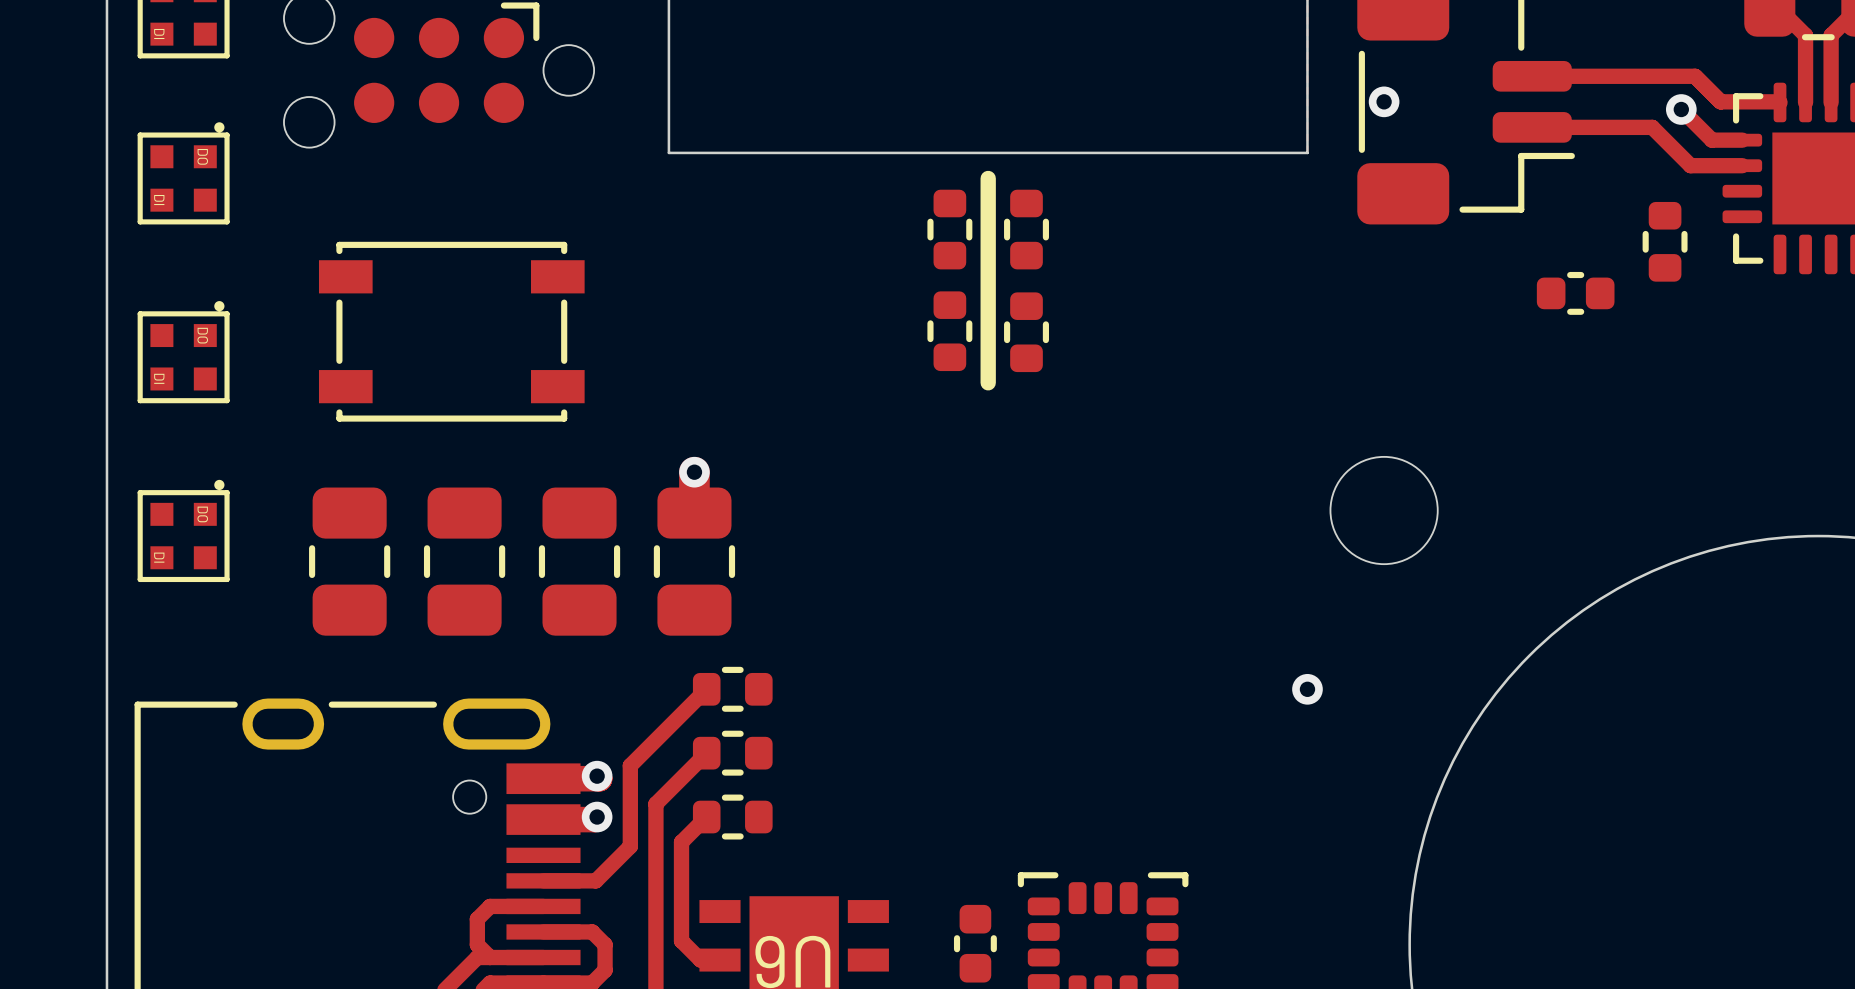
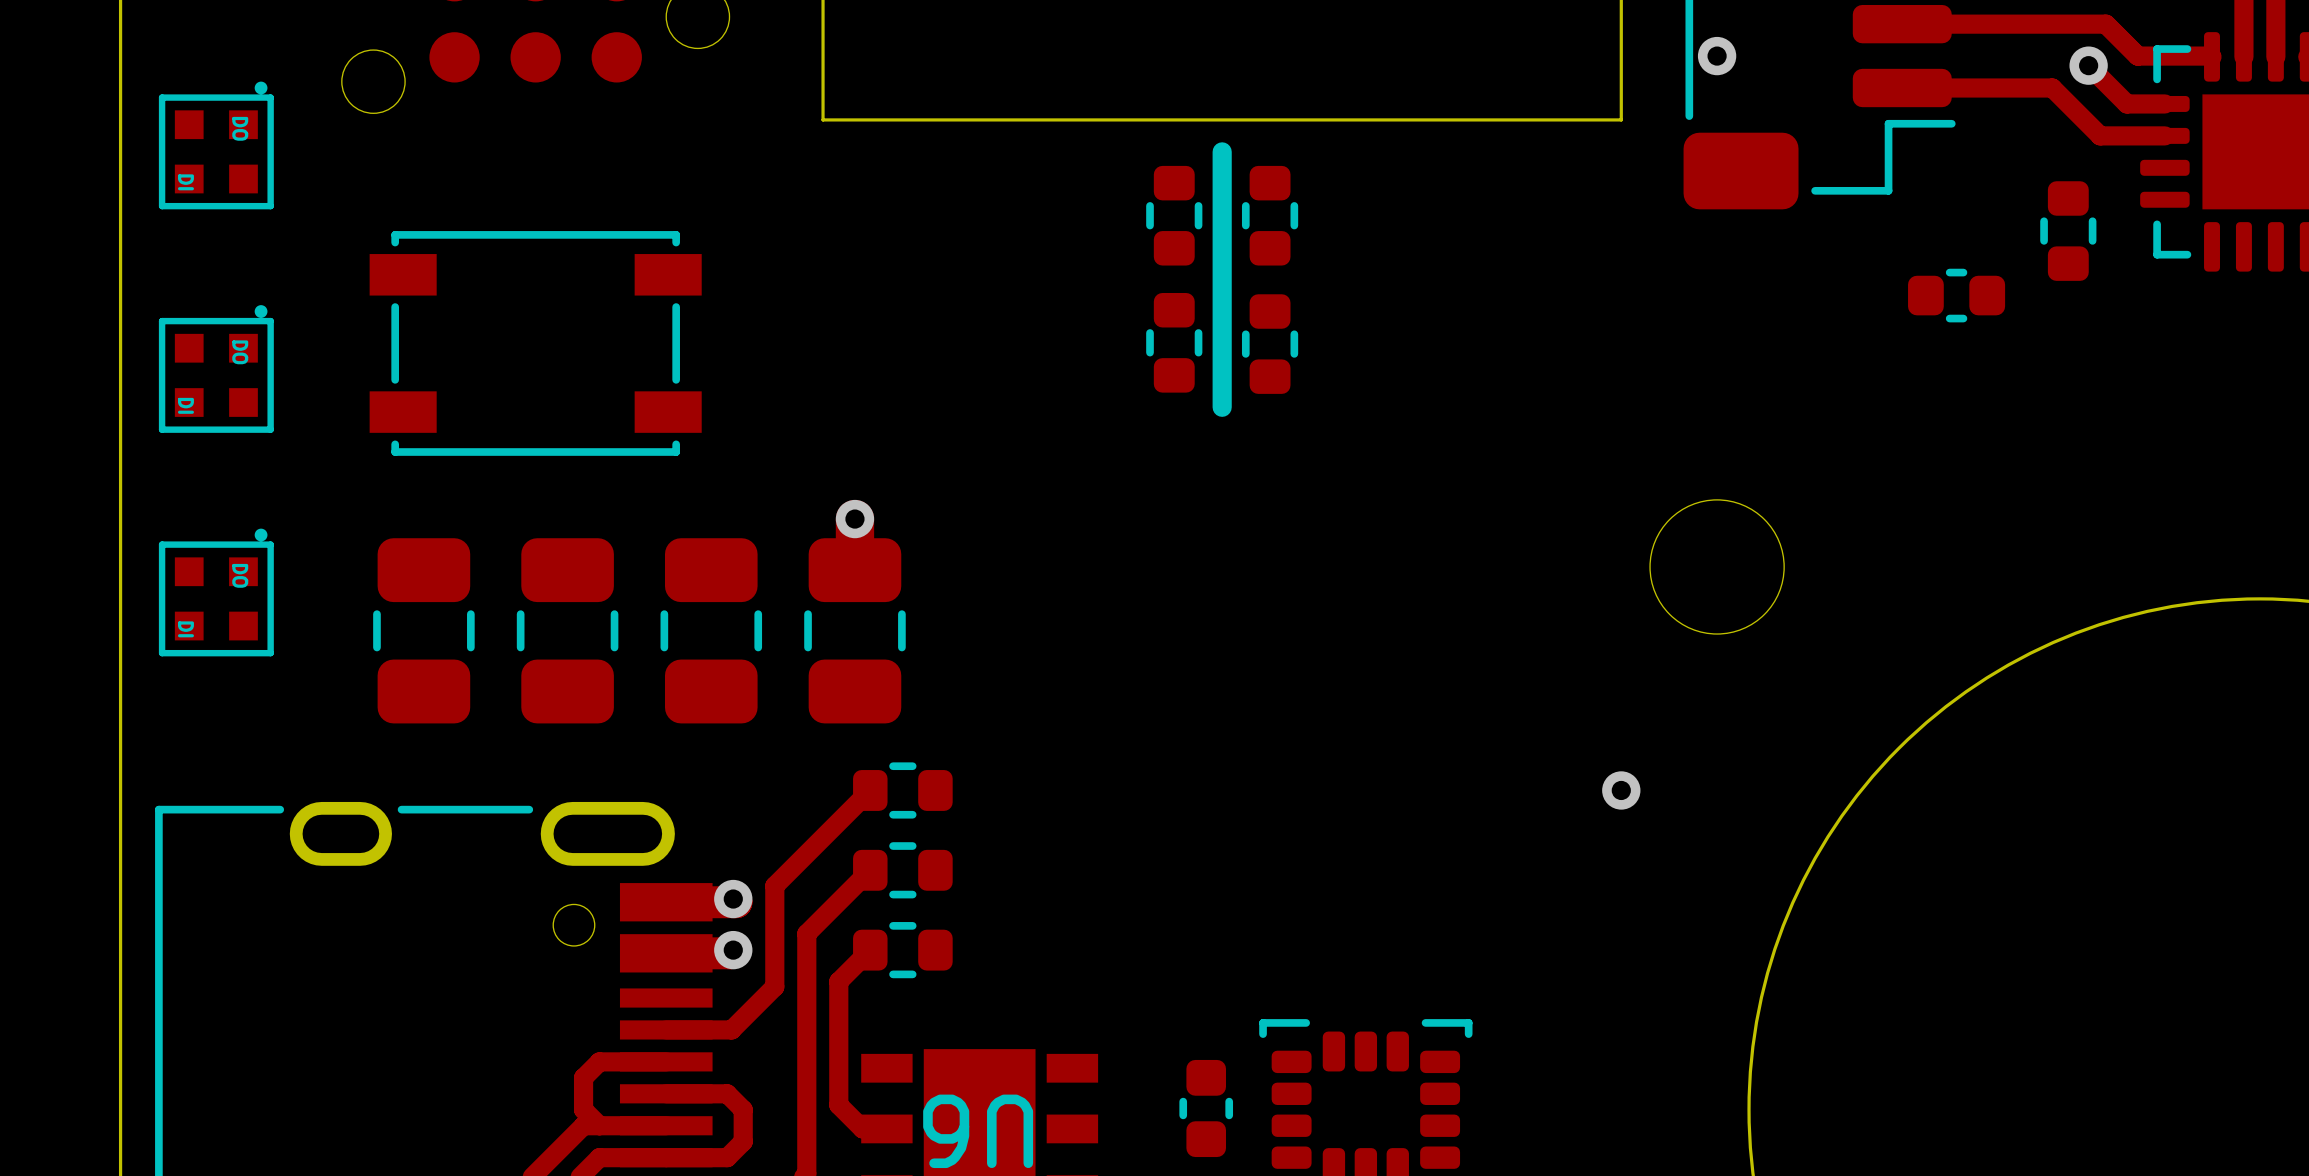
part position: (451, 331) -> (535, 343)

